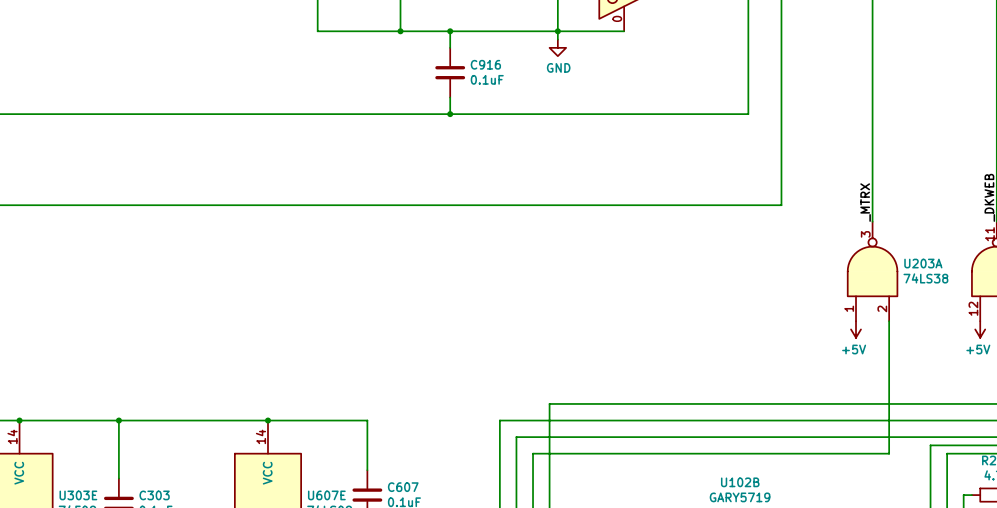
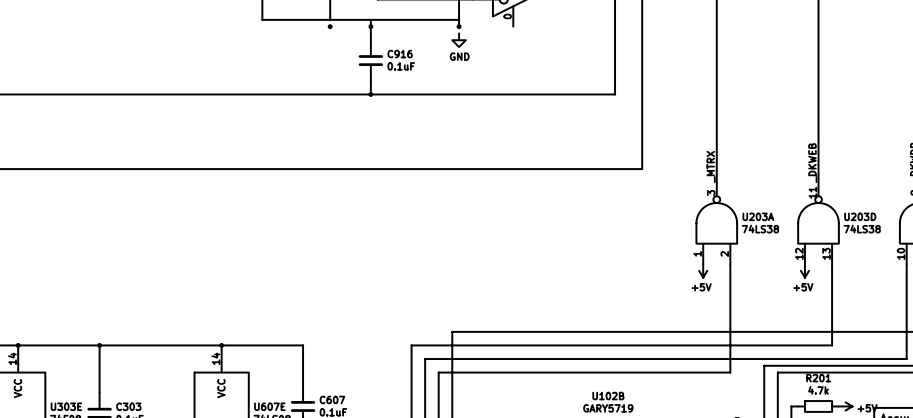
wire: (317, 23) (317, 31) (624, 31) -> (262, 19) (459, 19)
wire: (557, 31) (557, 39) -> none

